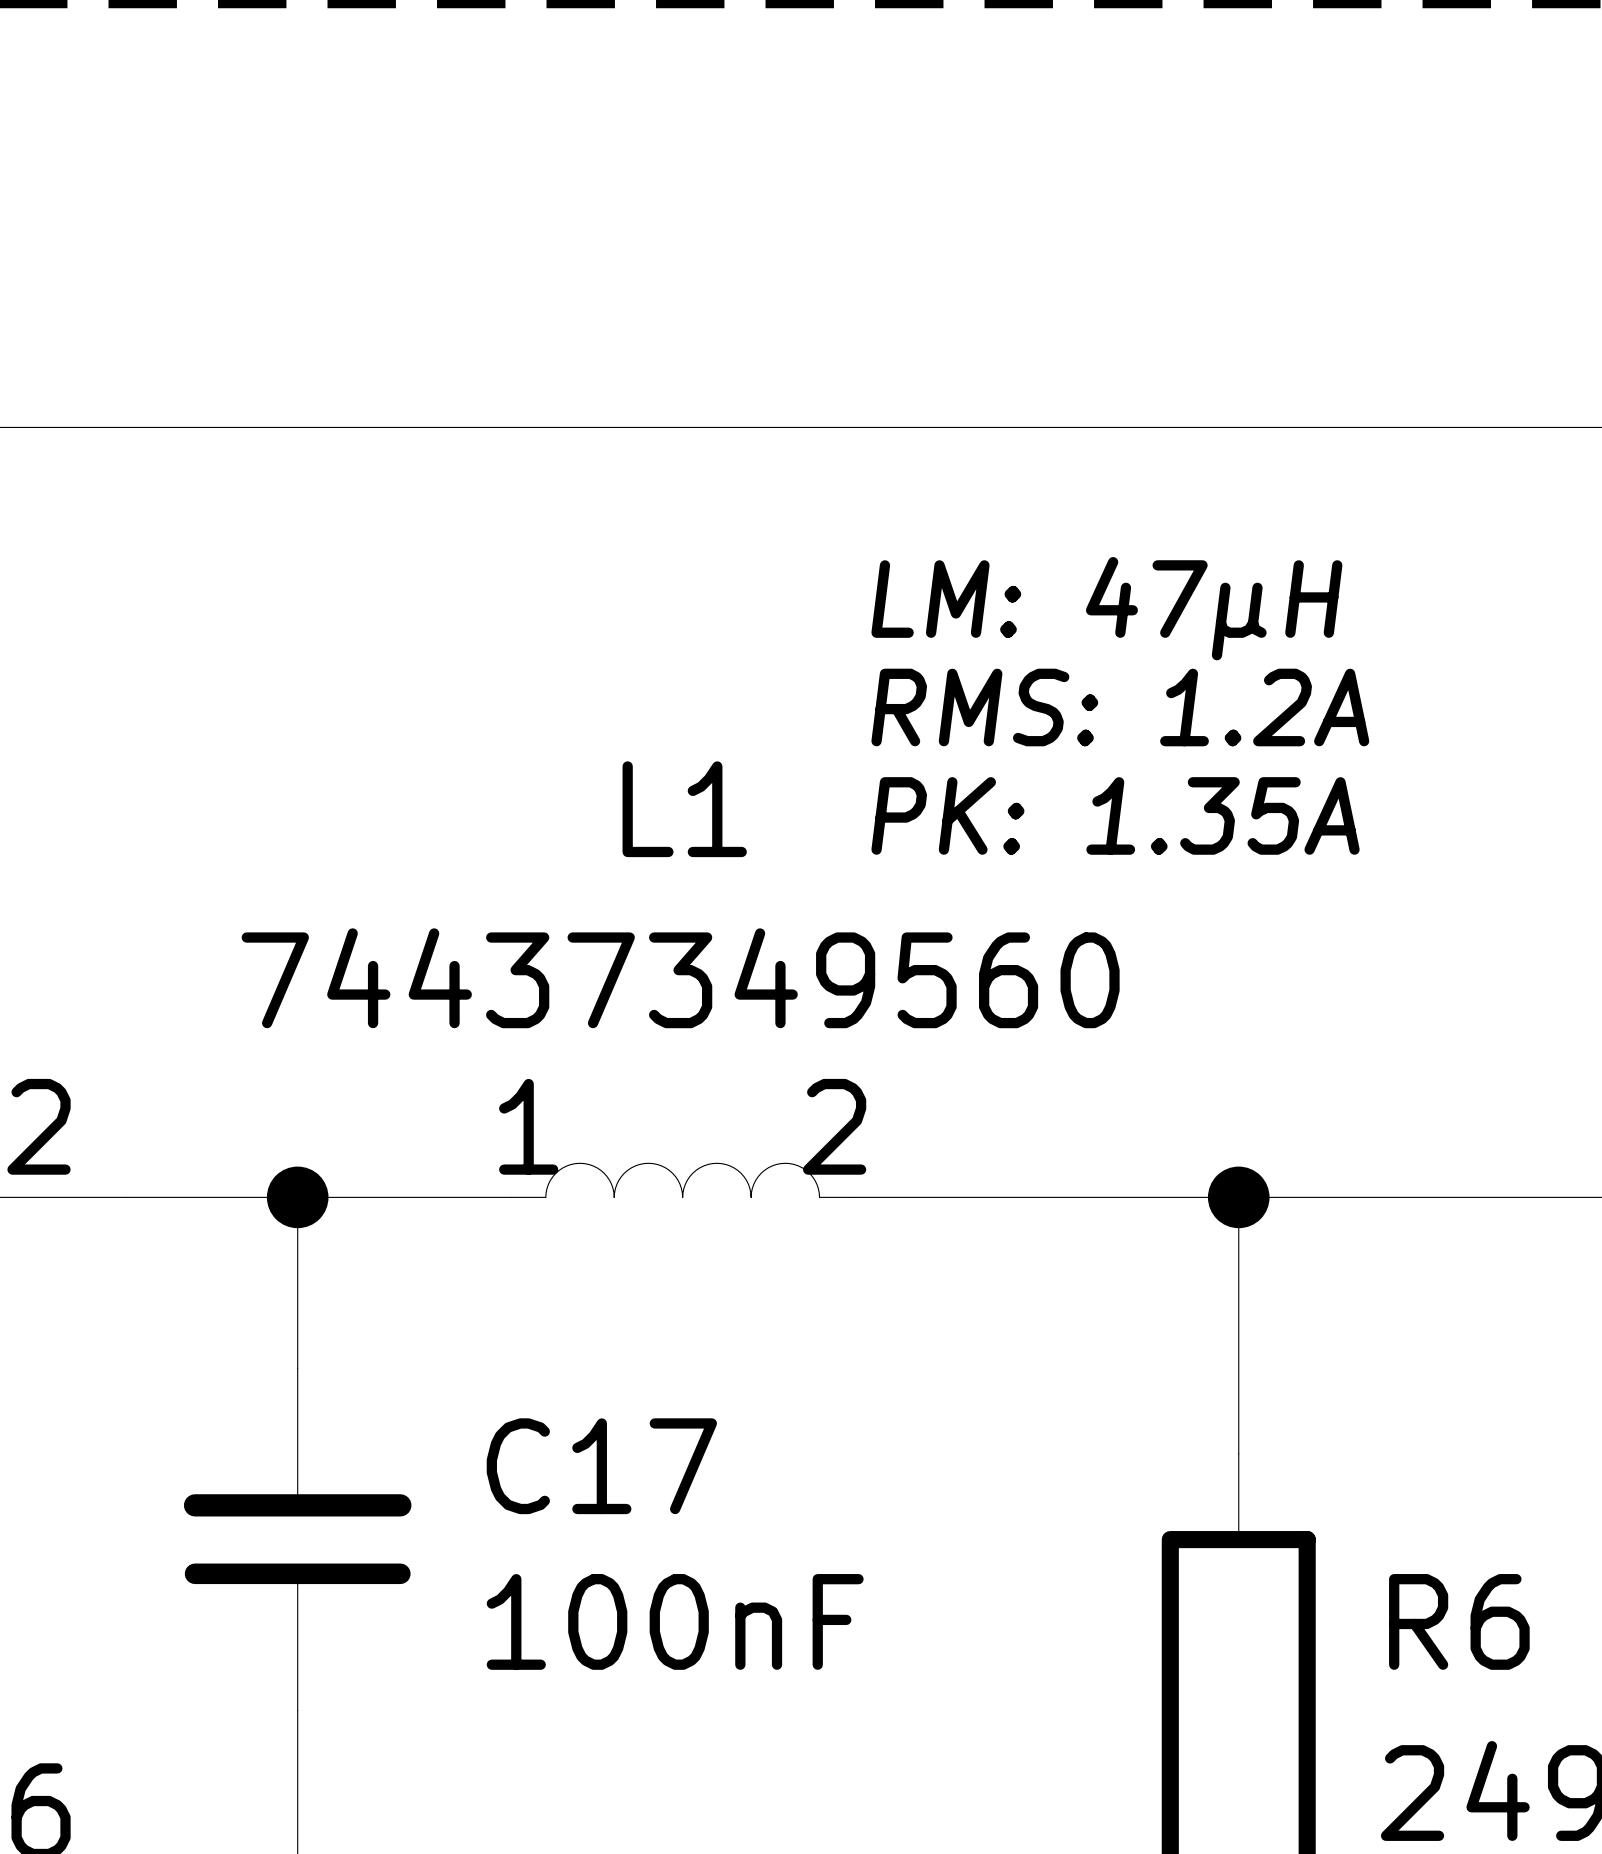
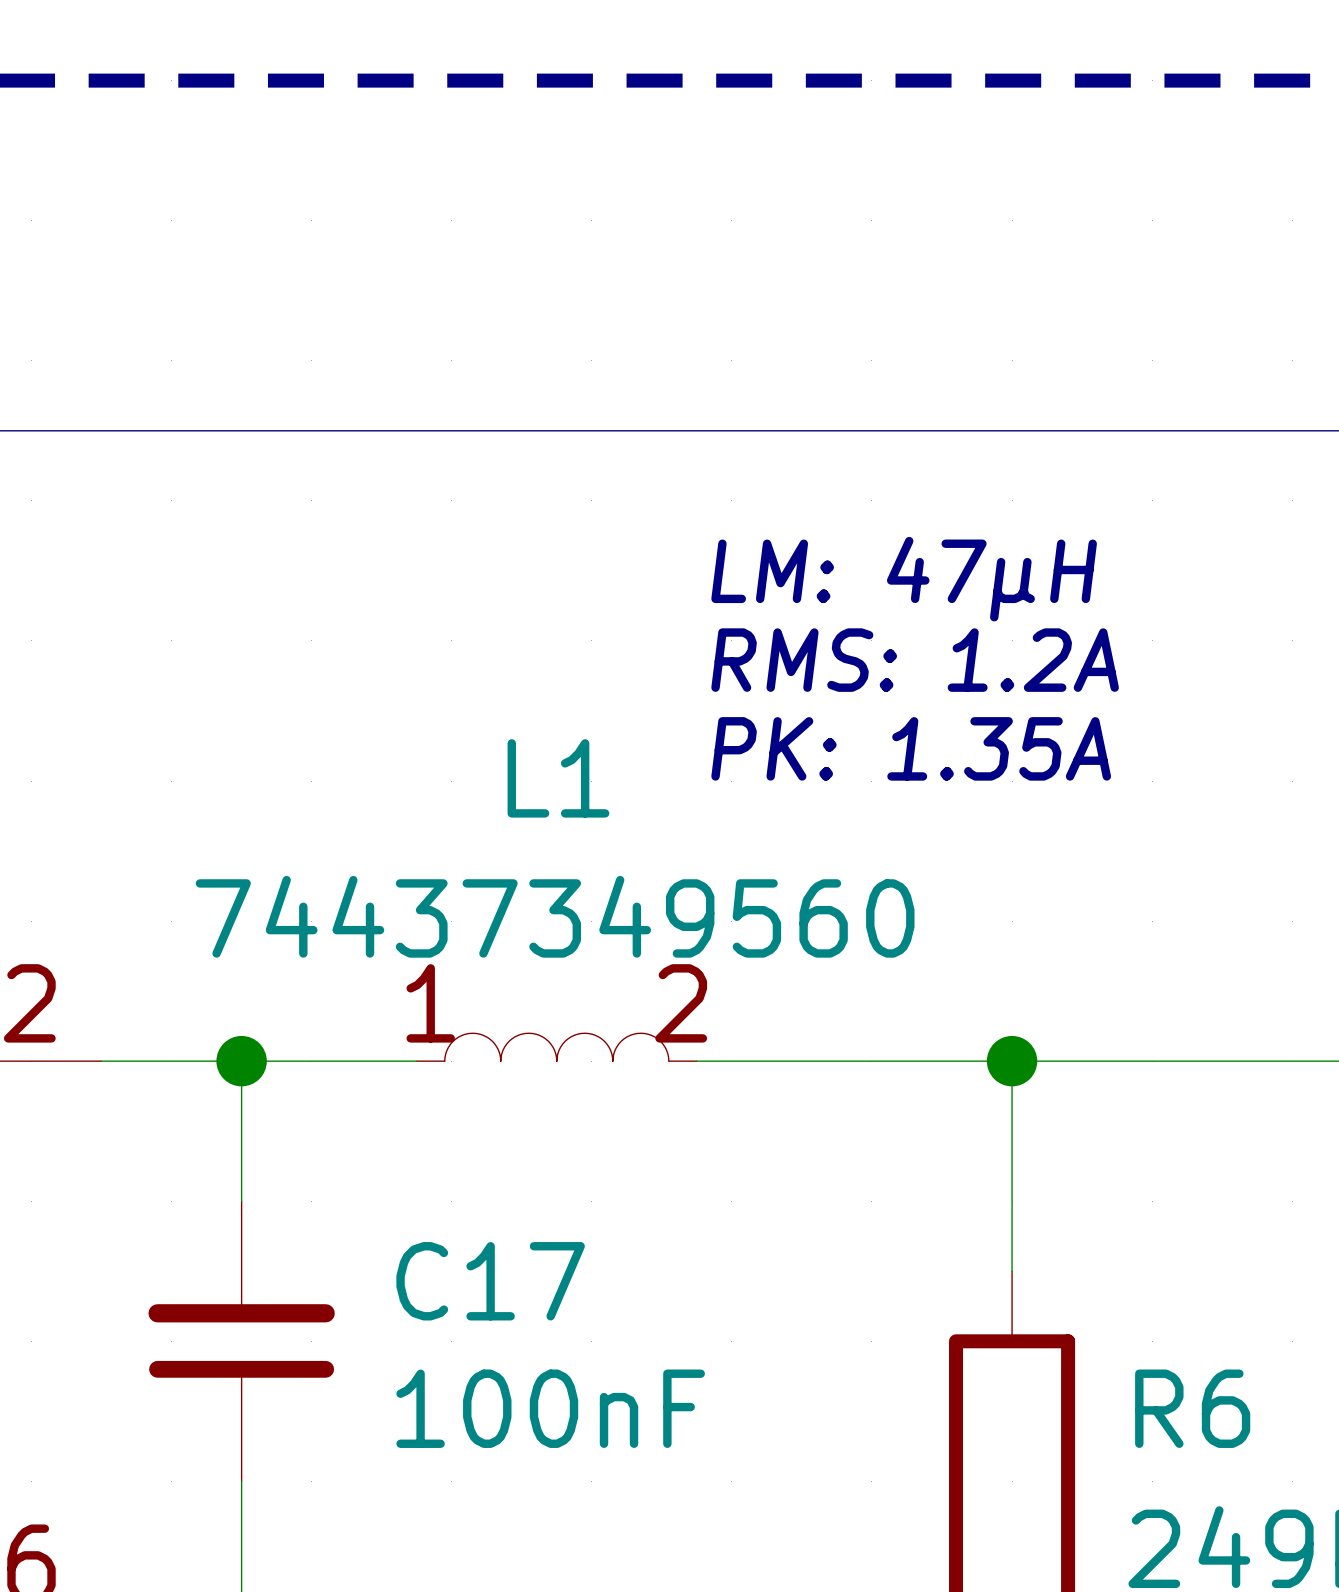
L1 name position: L1 (684, 809) -> L1 (558, 778)
L1 value position: 74437349560 (680, 978) -> 74437349560 (555, 916)

